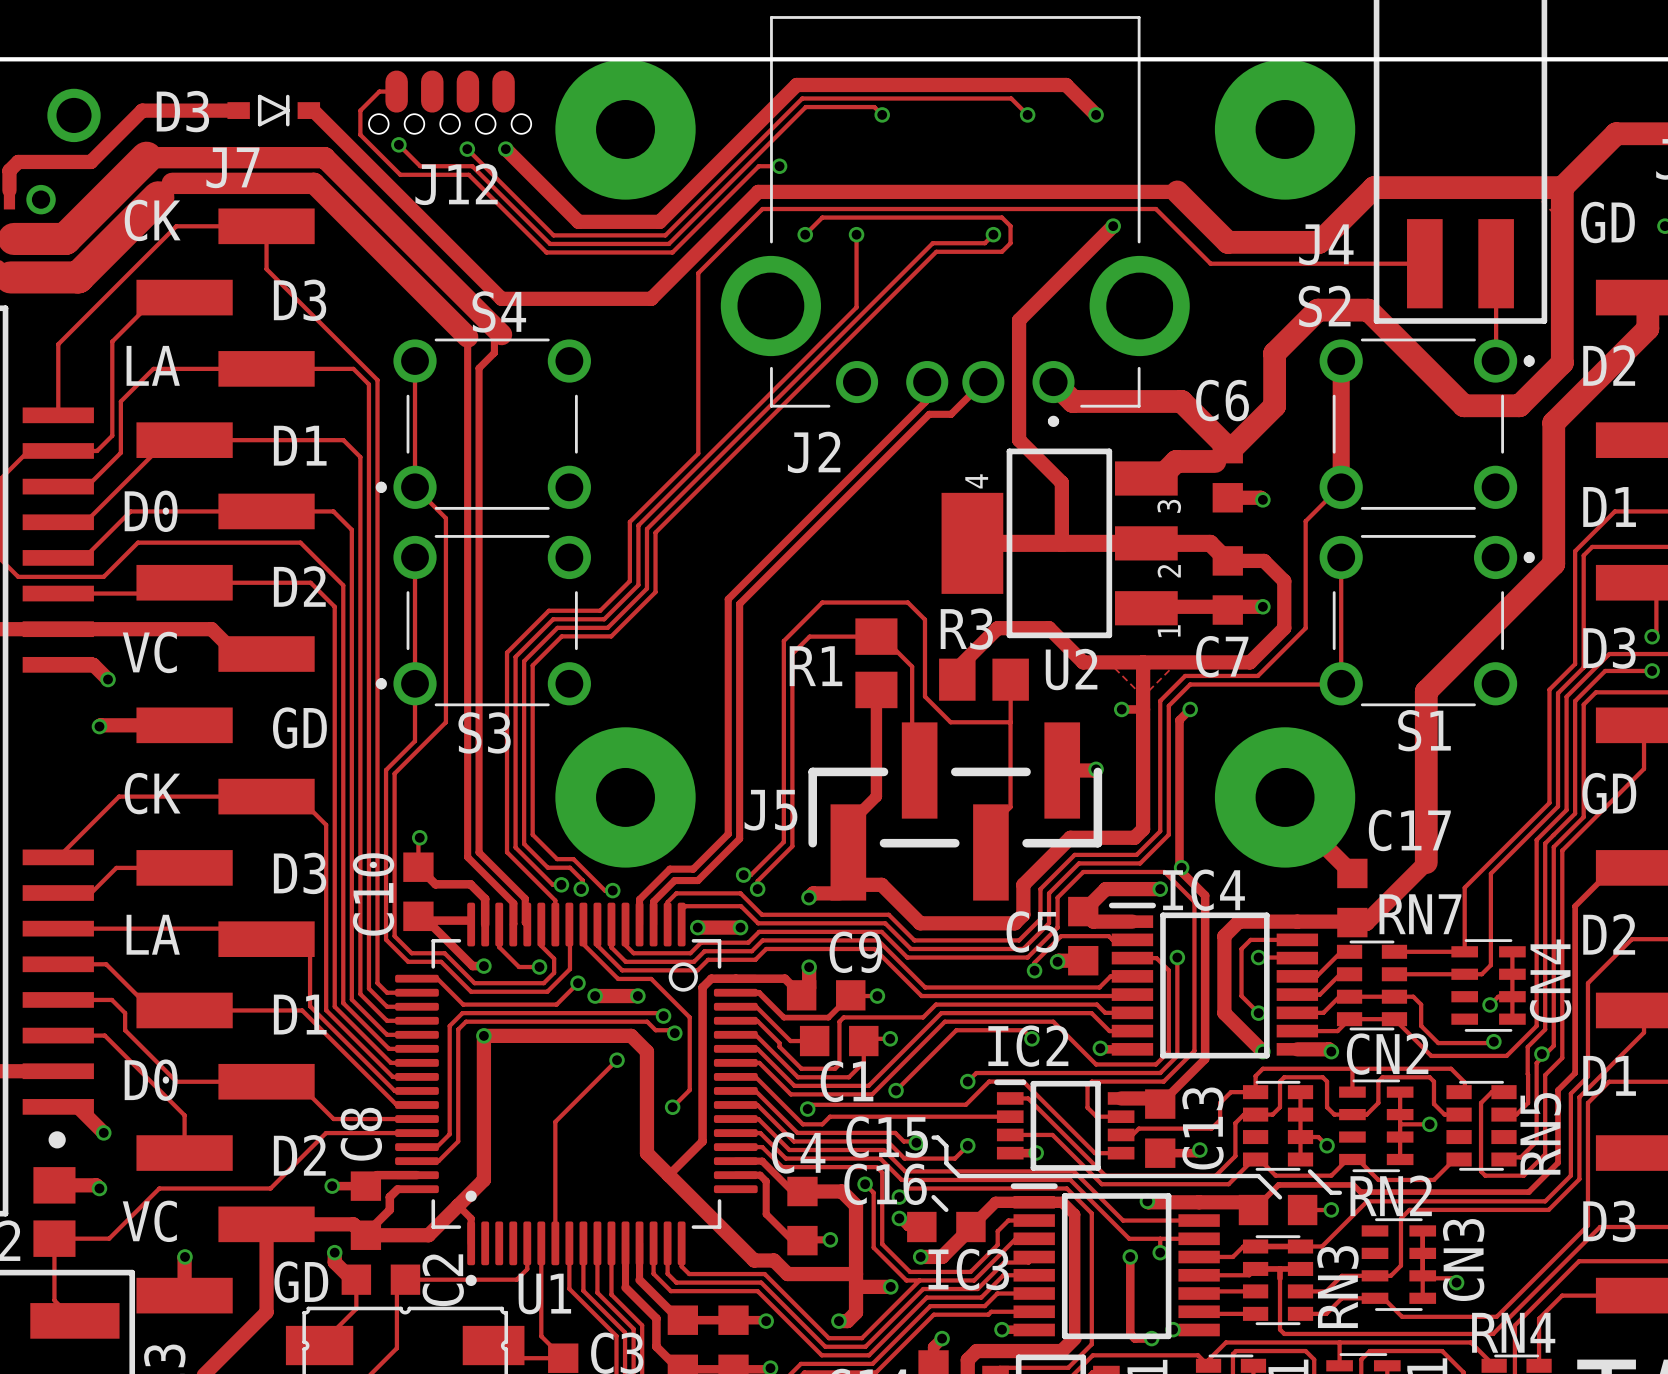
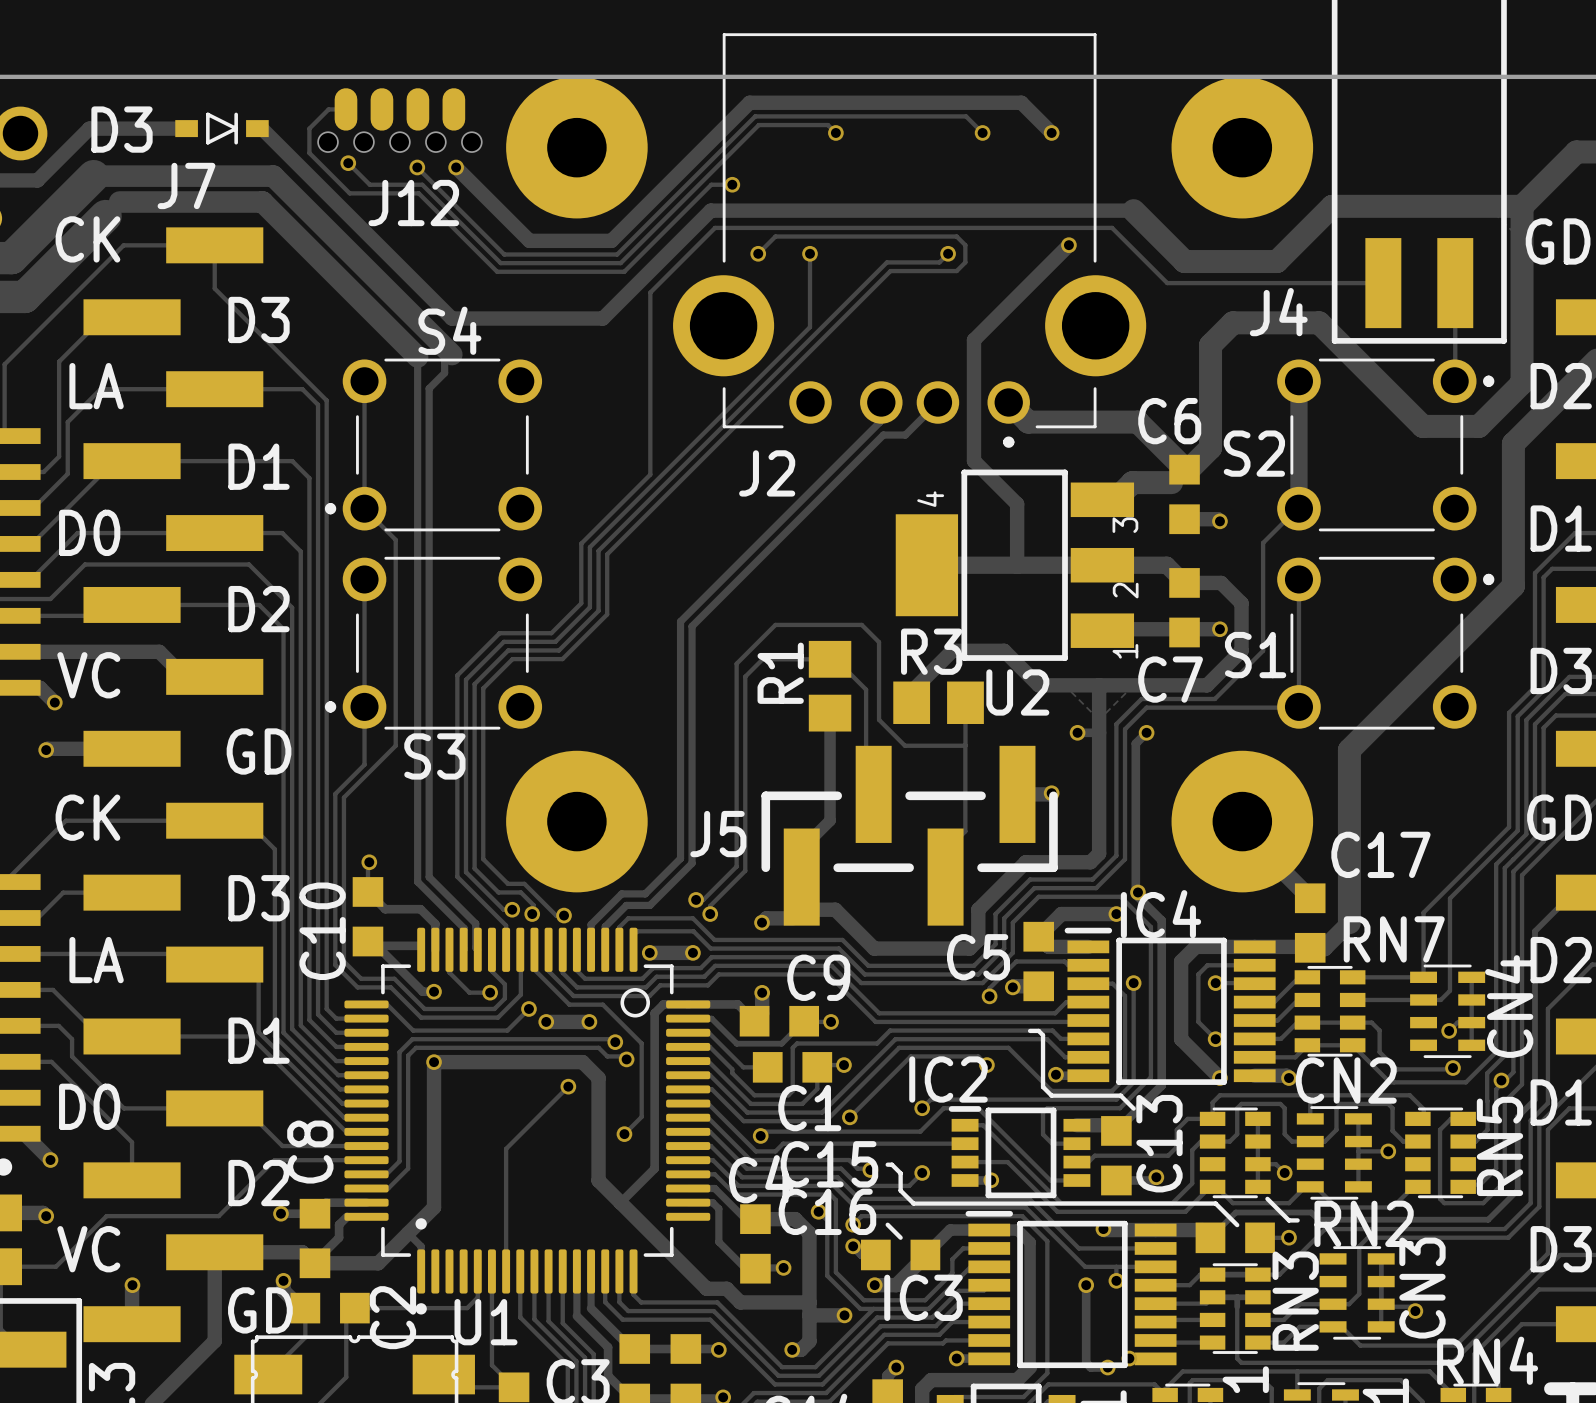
J4 name position: J4 (1326, 244) -> J4 (1278, 312)
S2 name position: S2 (1324, 306) -> S2 (1254, 453)
track: (1368, 310) (1317, 310) (1274, 353) (1274, 406) (1253, 427) -> (1326, 329) (1319, 322) (1232, 322) (1210, 345) (1210, 447)
R1 name rotation: 0° (815, 666) -> 90° counterclockwise (780, 673)
track: (1426, 691) (1426, 862) (1391, 897) -> (1384, 714) (1349, 750) (1349, 922)
S1 name position: S1 (1424, 730) -> S1 (1255, 655)
line: none -> (1030, 1030) (1038, 1030) (1043, 1035) (1043, 1087) (1051, 1095) (1120, 1095) (1133, 1108)
IC2 name position: IC2 (1028, 1046) -> IC2 (948, 1079)

